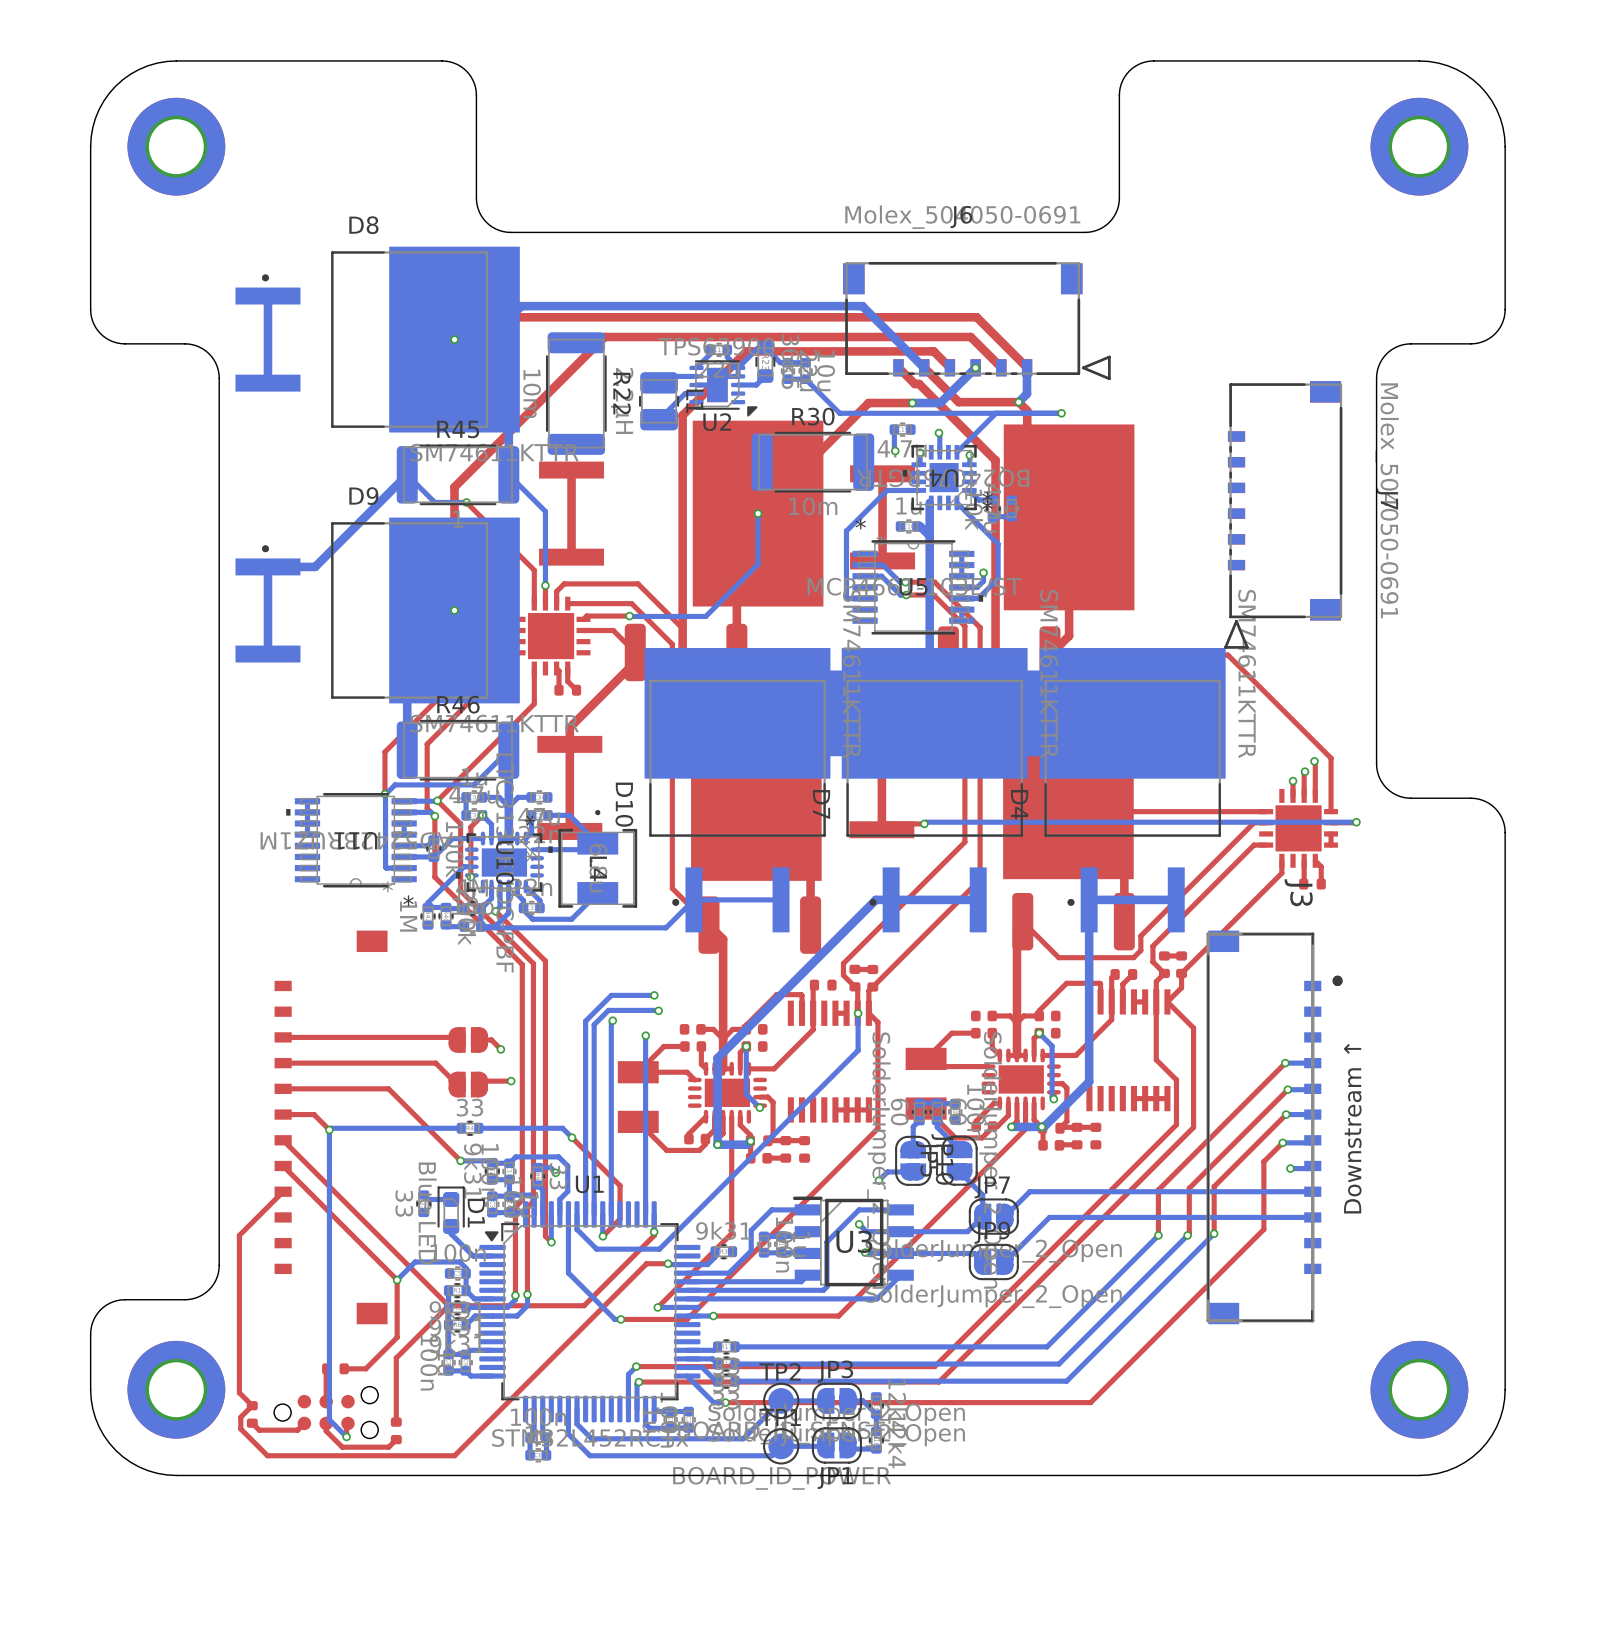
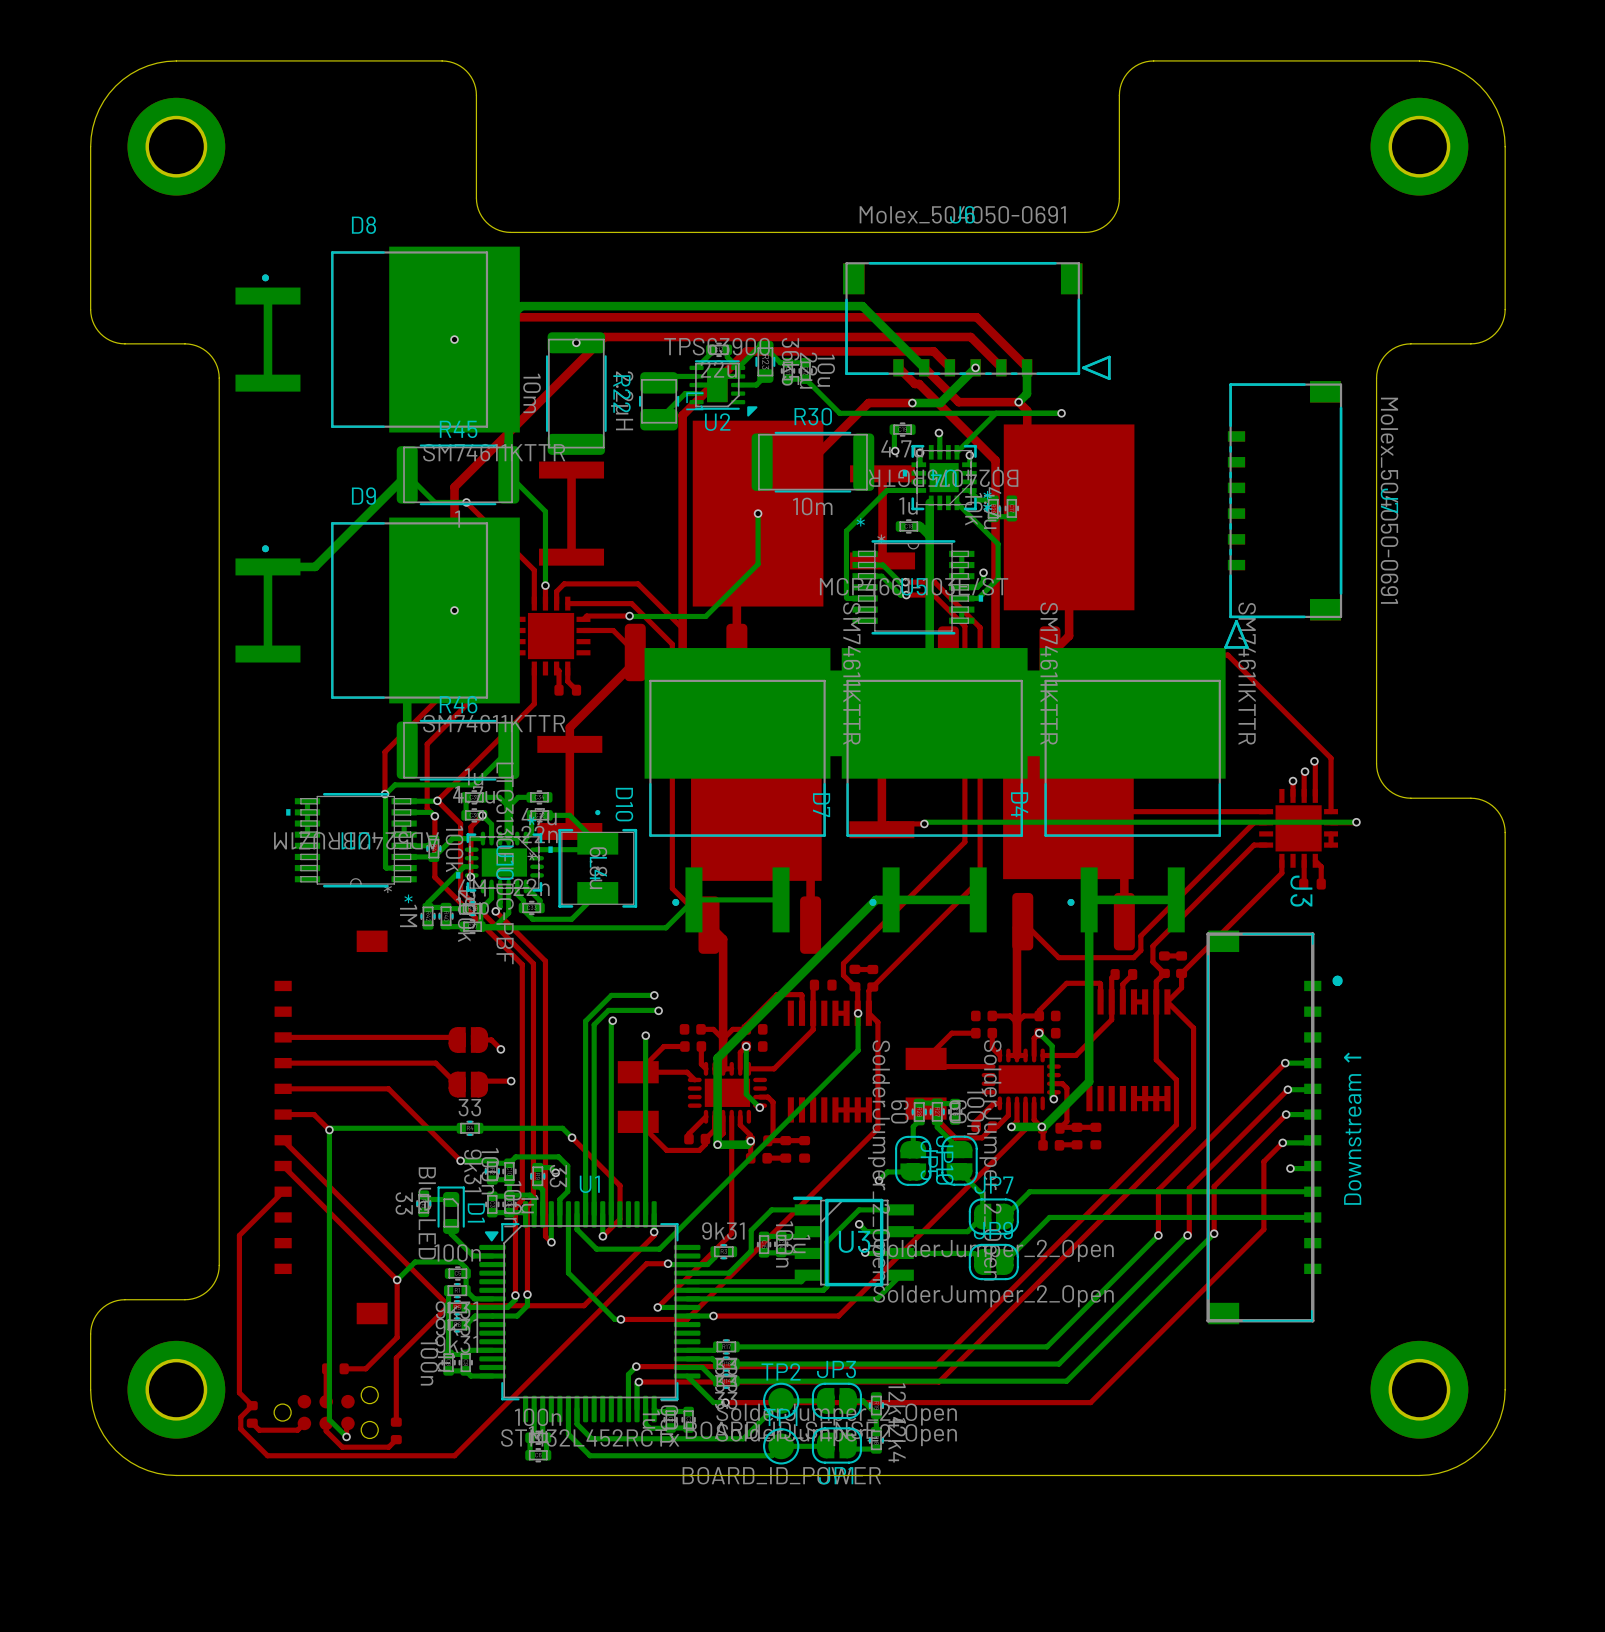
via: none -> (576, 342)

